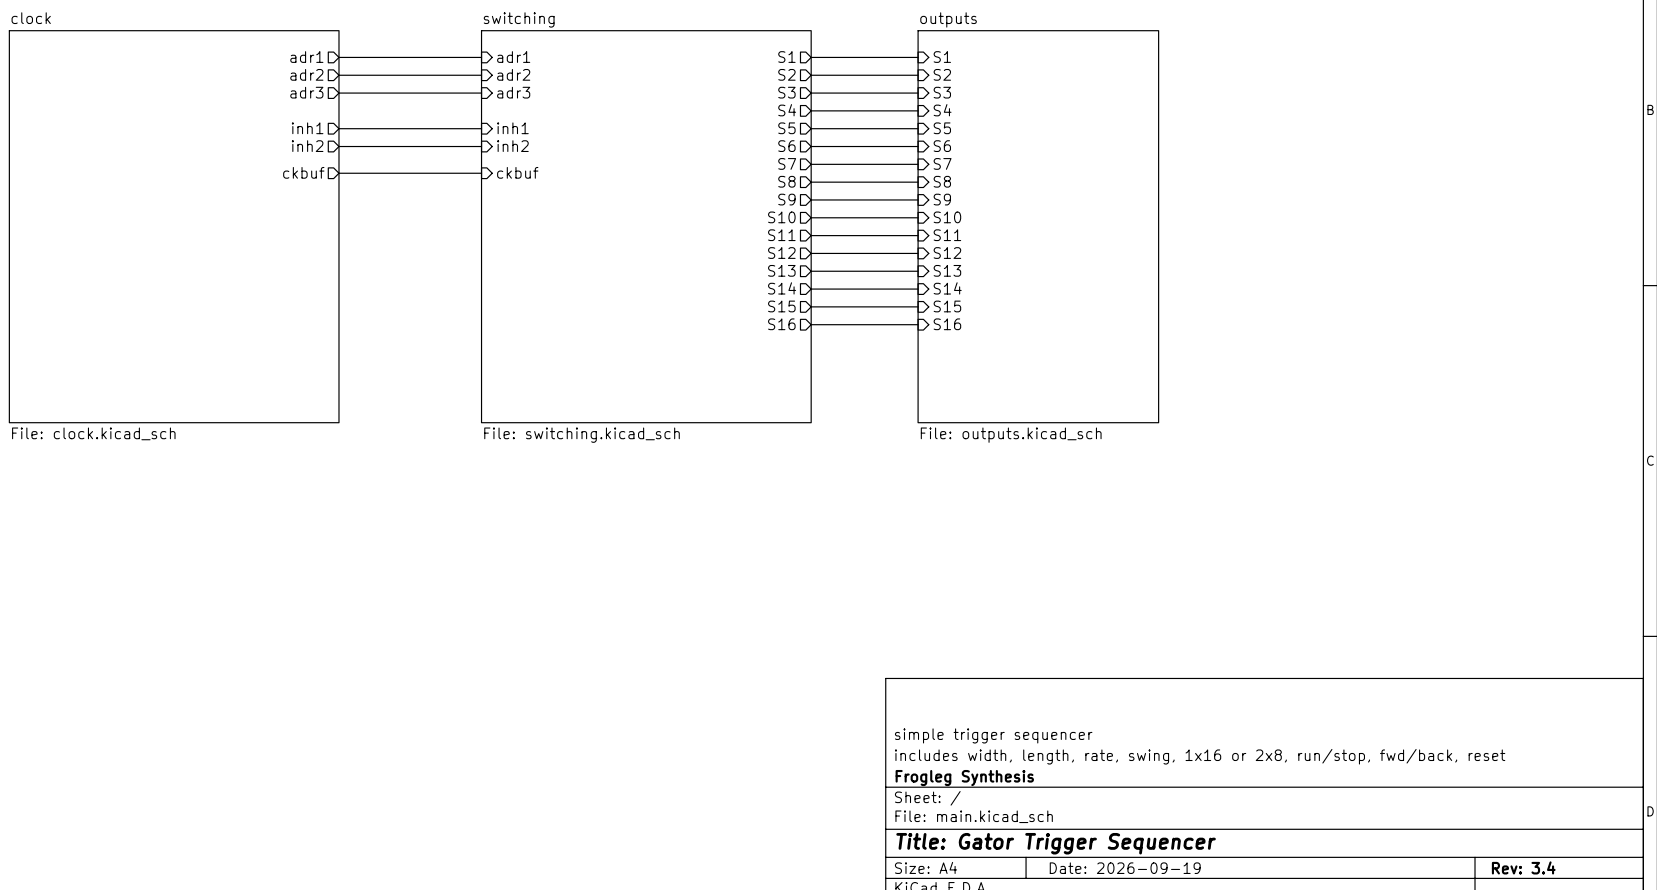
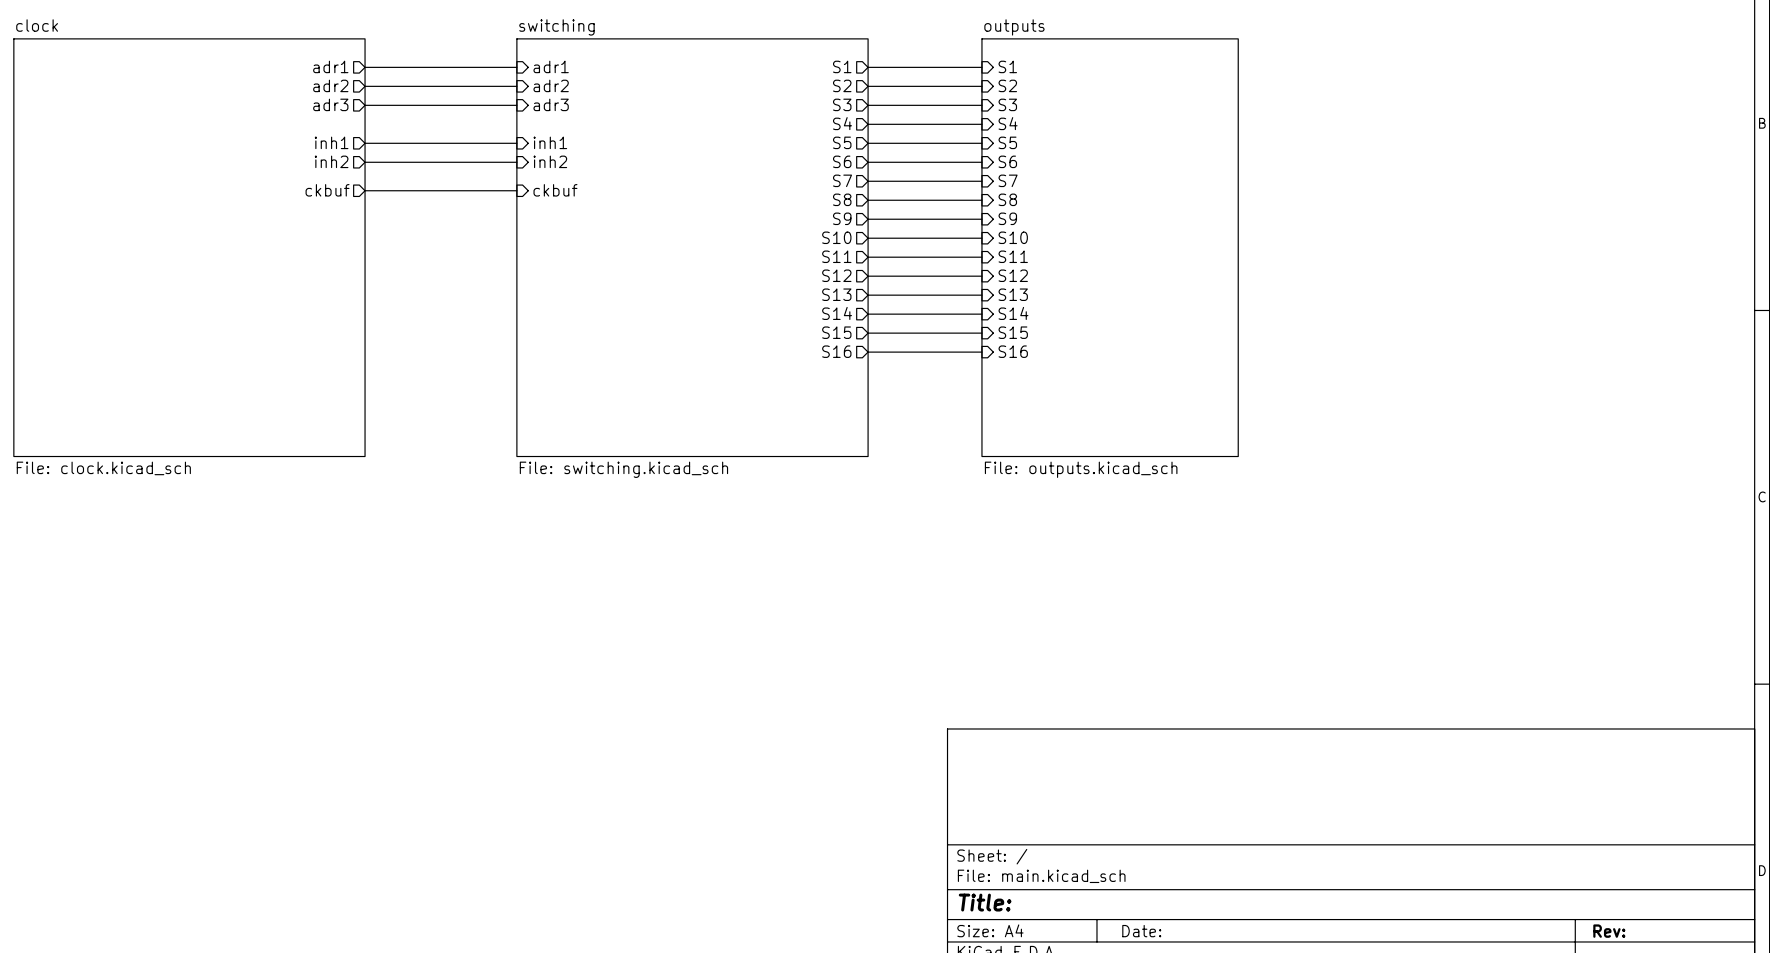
title block: simple trigger sequencer (993, 735) -> none
title block: includes width, length, rate, swing, 1x16 or 2x8, run/stop, fwd/back, reset (1200, 756) -> none
title block: Frogleg Synthesis (964, 778) -> none
title block: Title: Gator Trigger Sequencer (1056, 843) -> Title: (985, 902)
title block: Rev: 3.4 (1523, 867) -> Rev: (1609, 931)
title block: Date: 2026-09-19 (1125, 868) -> Date: (1141, 931)

